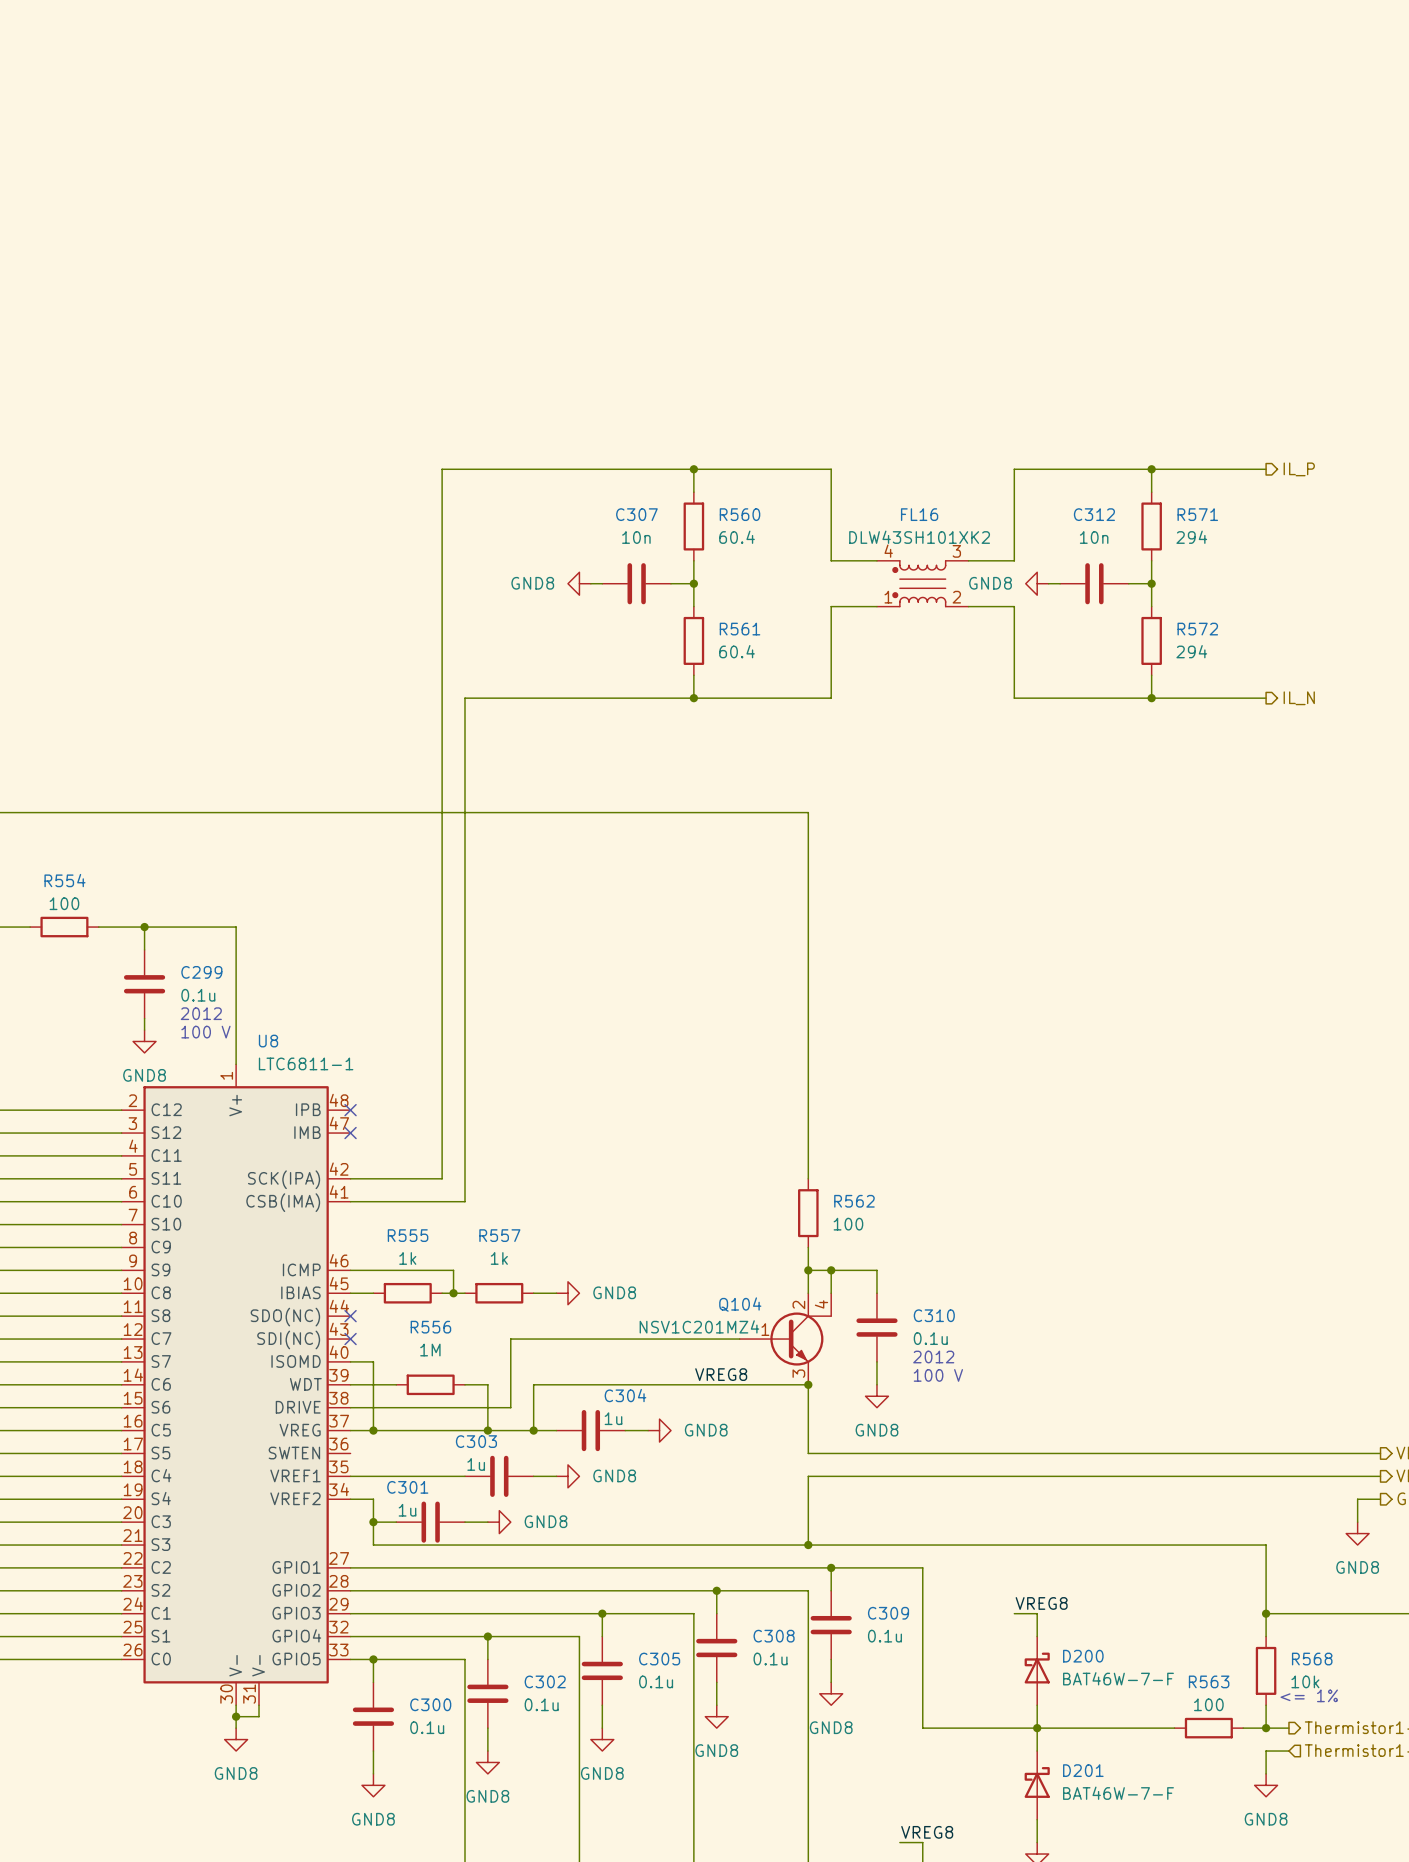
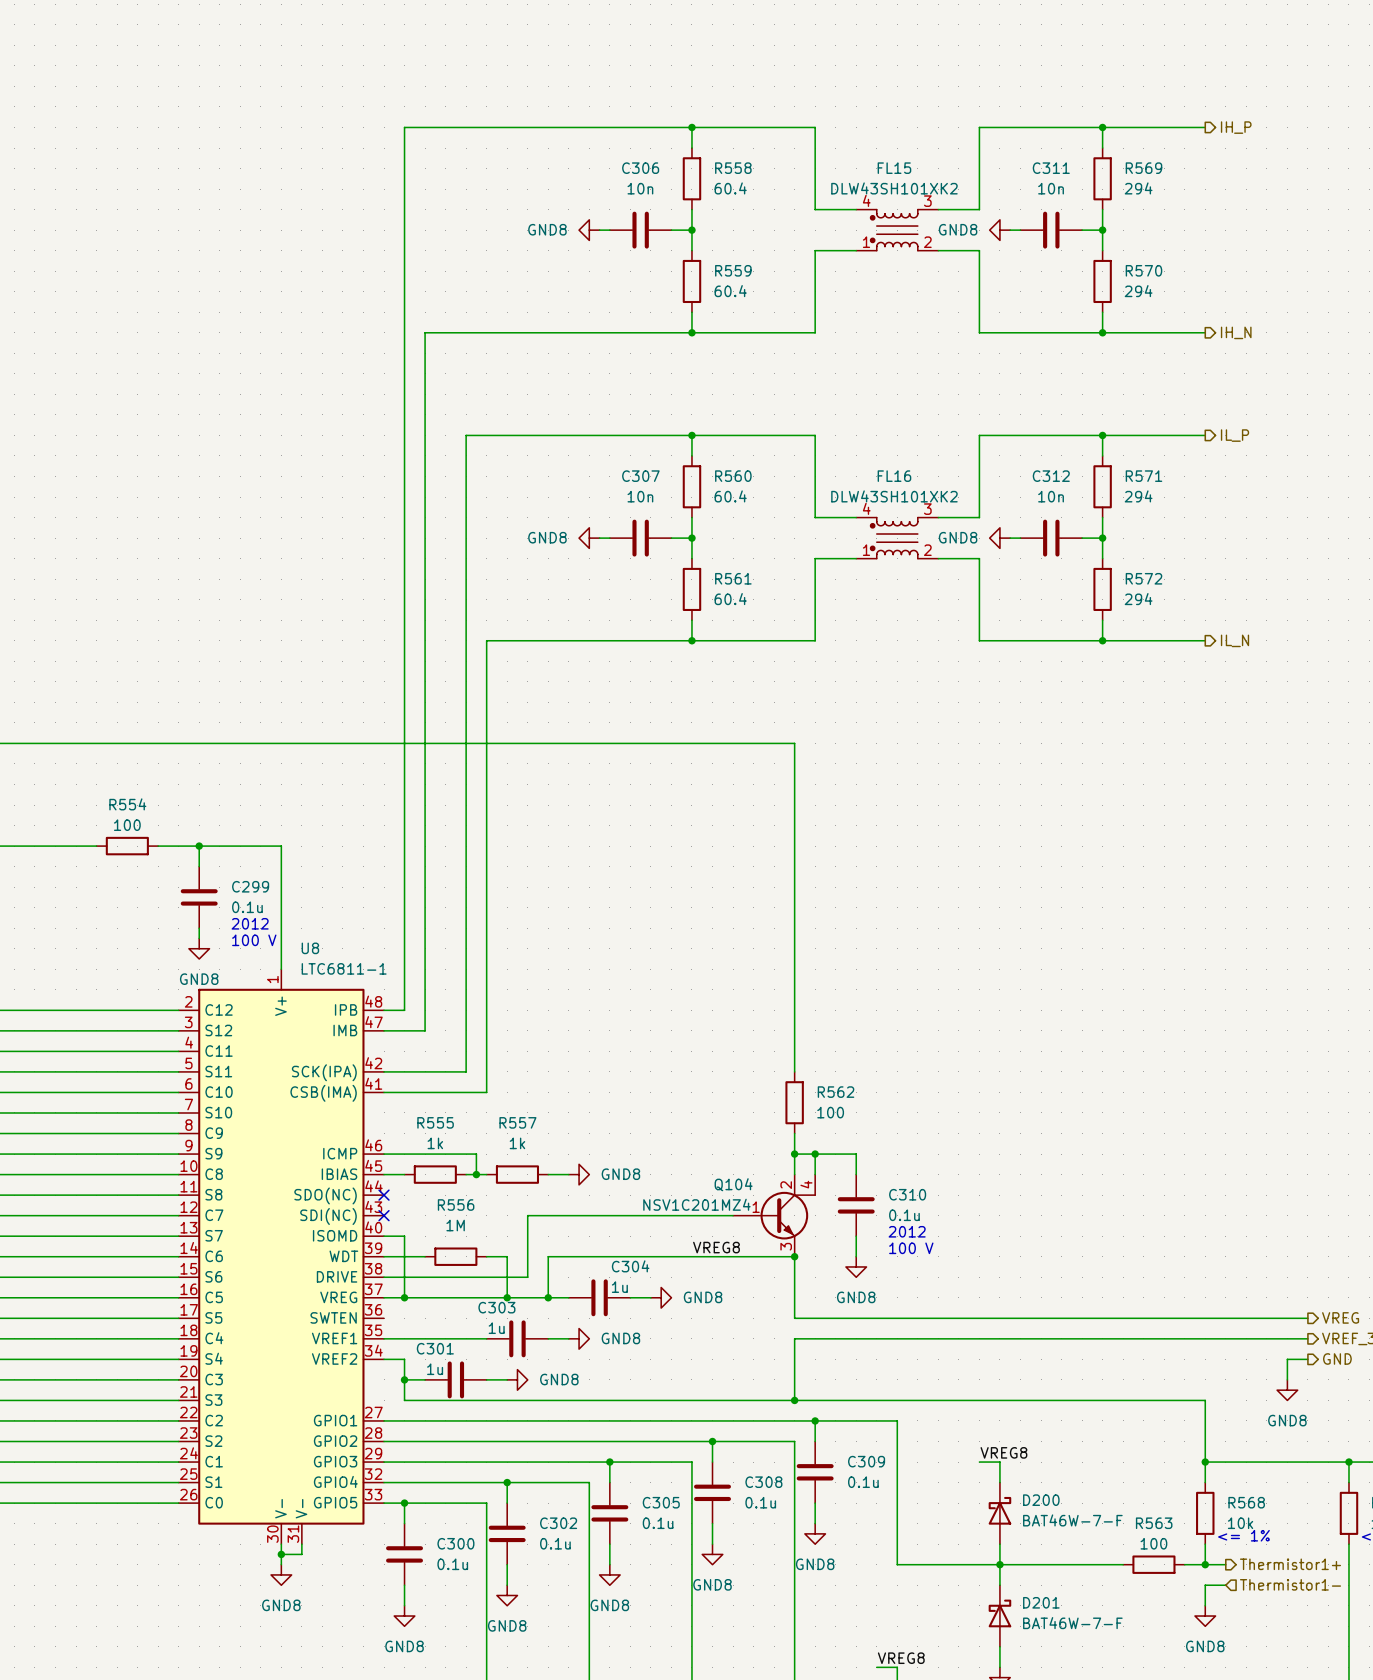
wire: none -> (691, 127) (691, 148)
junction: none -> (691, 127)
wire: none -> (1102, 127) (1102, 148)
junction: none -> (1102, 127)
wire: none -> (1205, 127) (979, 127) (979, 209) (938, 209)
hierarchical label: none -> IH_P (1236, 127)
R558: none -> 60.4 (691, 178)
R569: none -> 294 (1102, 178)
wire: none -> (691, 209) (691, 250)
wire: none -> (856, 209) (815, 209) (815, 127) (404, 127) (404, 1010) (384, 1010)
wire: none -> (1102, 209) (1102, 250)
power symbol: none -> GND8 (589, 230)
wire: none -> (599, 230) (609, 230)
C306: none -> 10n (640, 230)
wire: none -> (671, 230) (691, 230)
junction: none -> (691, 230)
FL15: none -> DLW43SH101XK2 (897, 230)
power symbol: none -> GND8 (999, 230)
wire: none -> (1010, 230) (1020, 230)
C311: none -> 10n (1051, 230)
wire: none -> (1082, 230) (1102, 230)
junction: none -> (1102, 230)
wire: none -> (856, 250) (815, 250) (815, 332) (425, 332) (425, 1030) (384, 1030)
wire: none -> (938, 250) (979, 250) (979, 332) (1205, 332)
R559: none -> 60.4 (691, 281)
R570: none -> 294 (1102, 281)
wire: none -> (691, 312) (691, 332)
wire: none -> (1102, 312) (1102, 332)
junction: none -> (691, 332)
junction: none -> (1102, 332)
hierarchical label: none -> IH_N (1236, 332)
no-connect mark: (350, 1110) -> none
no-connect mark: (350, 1133) -> none

